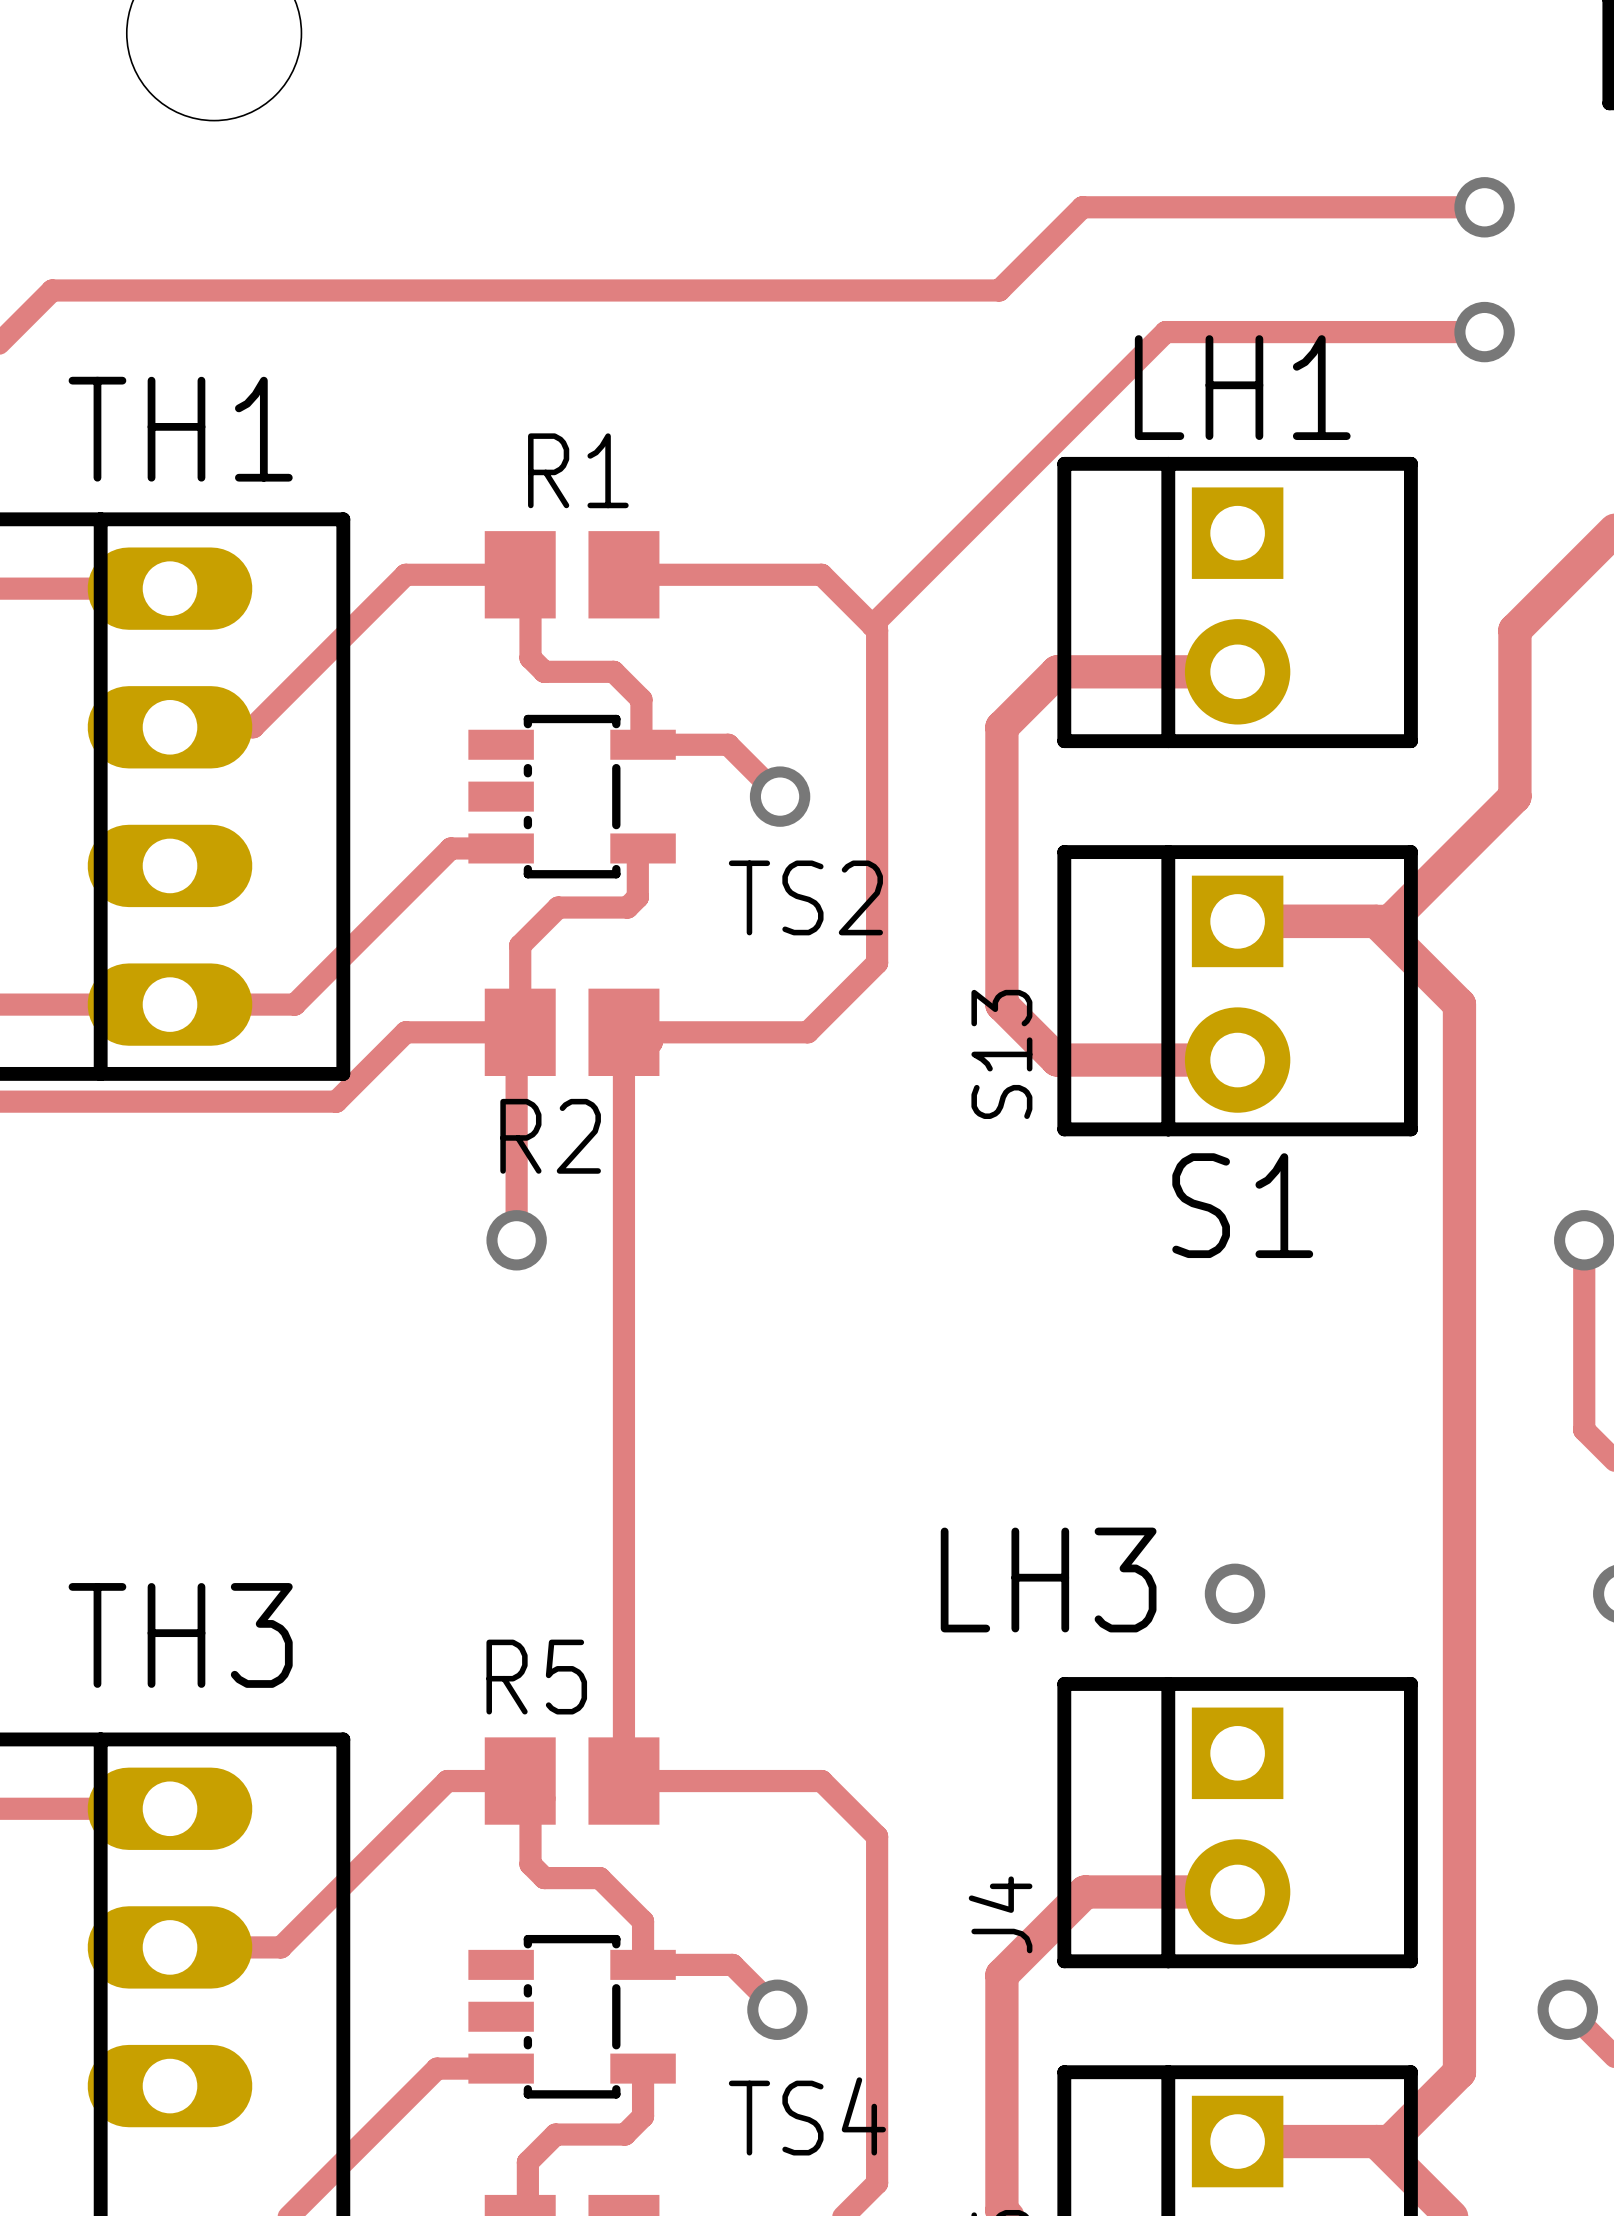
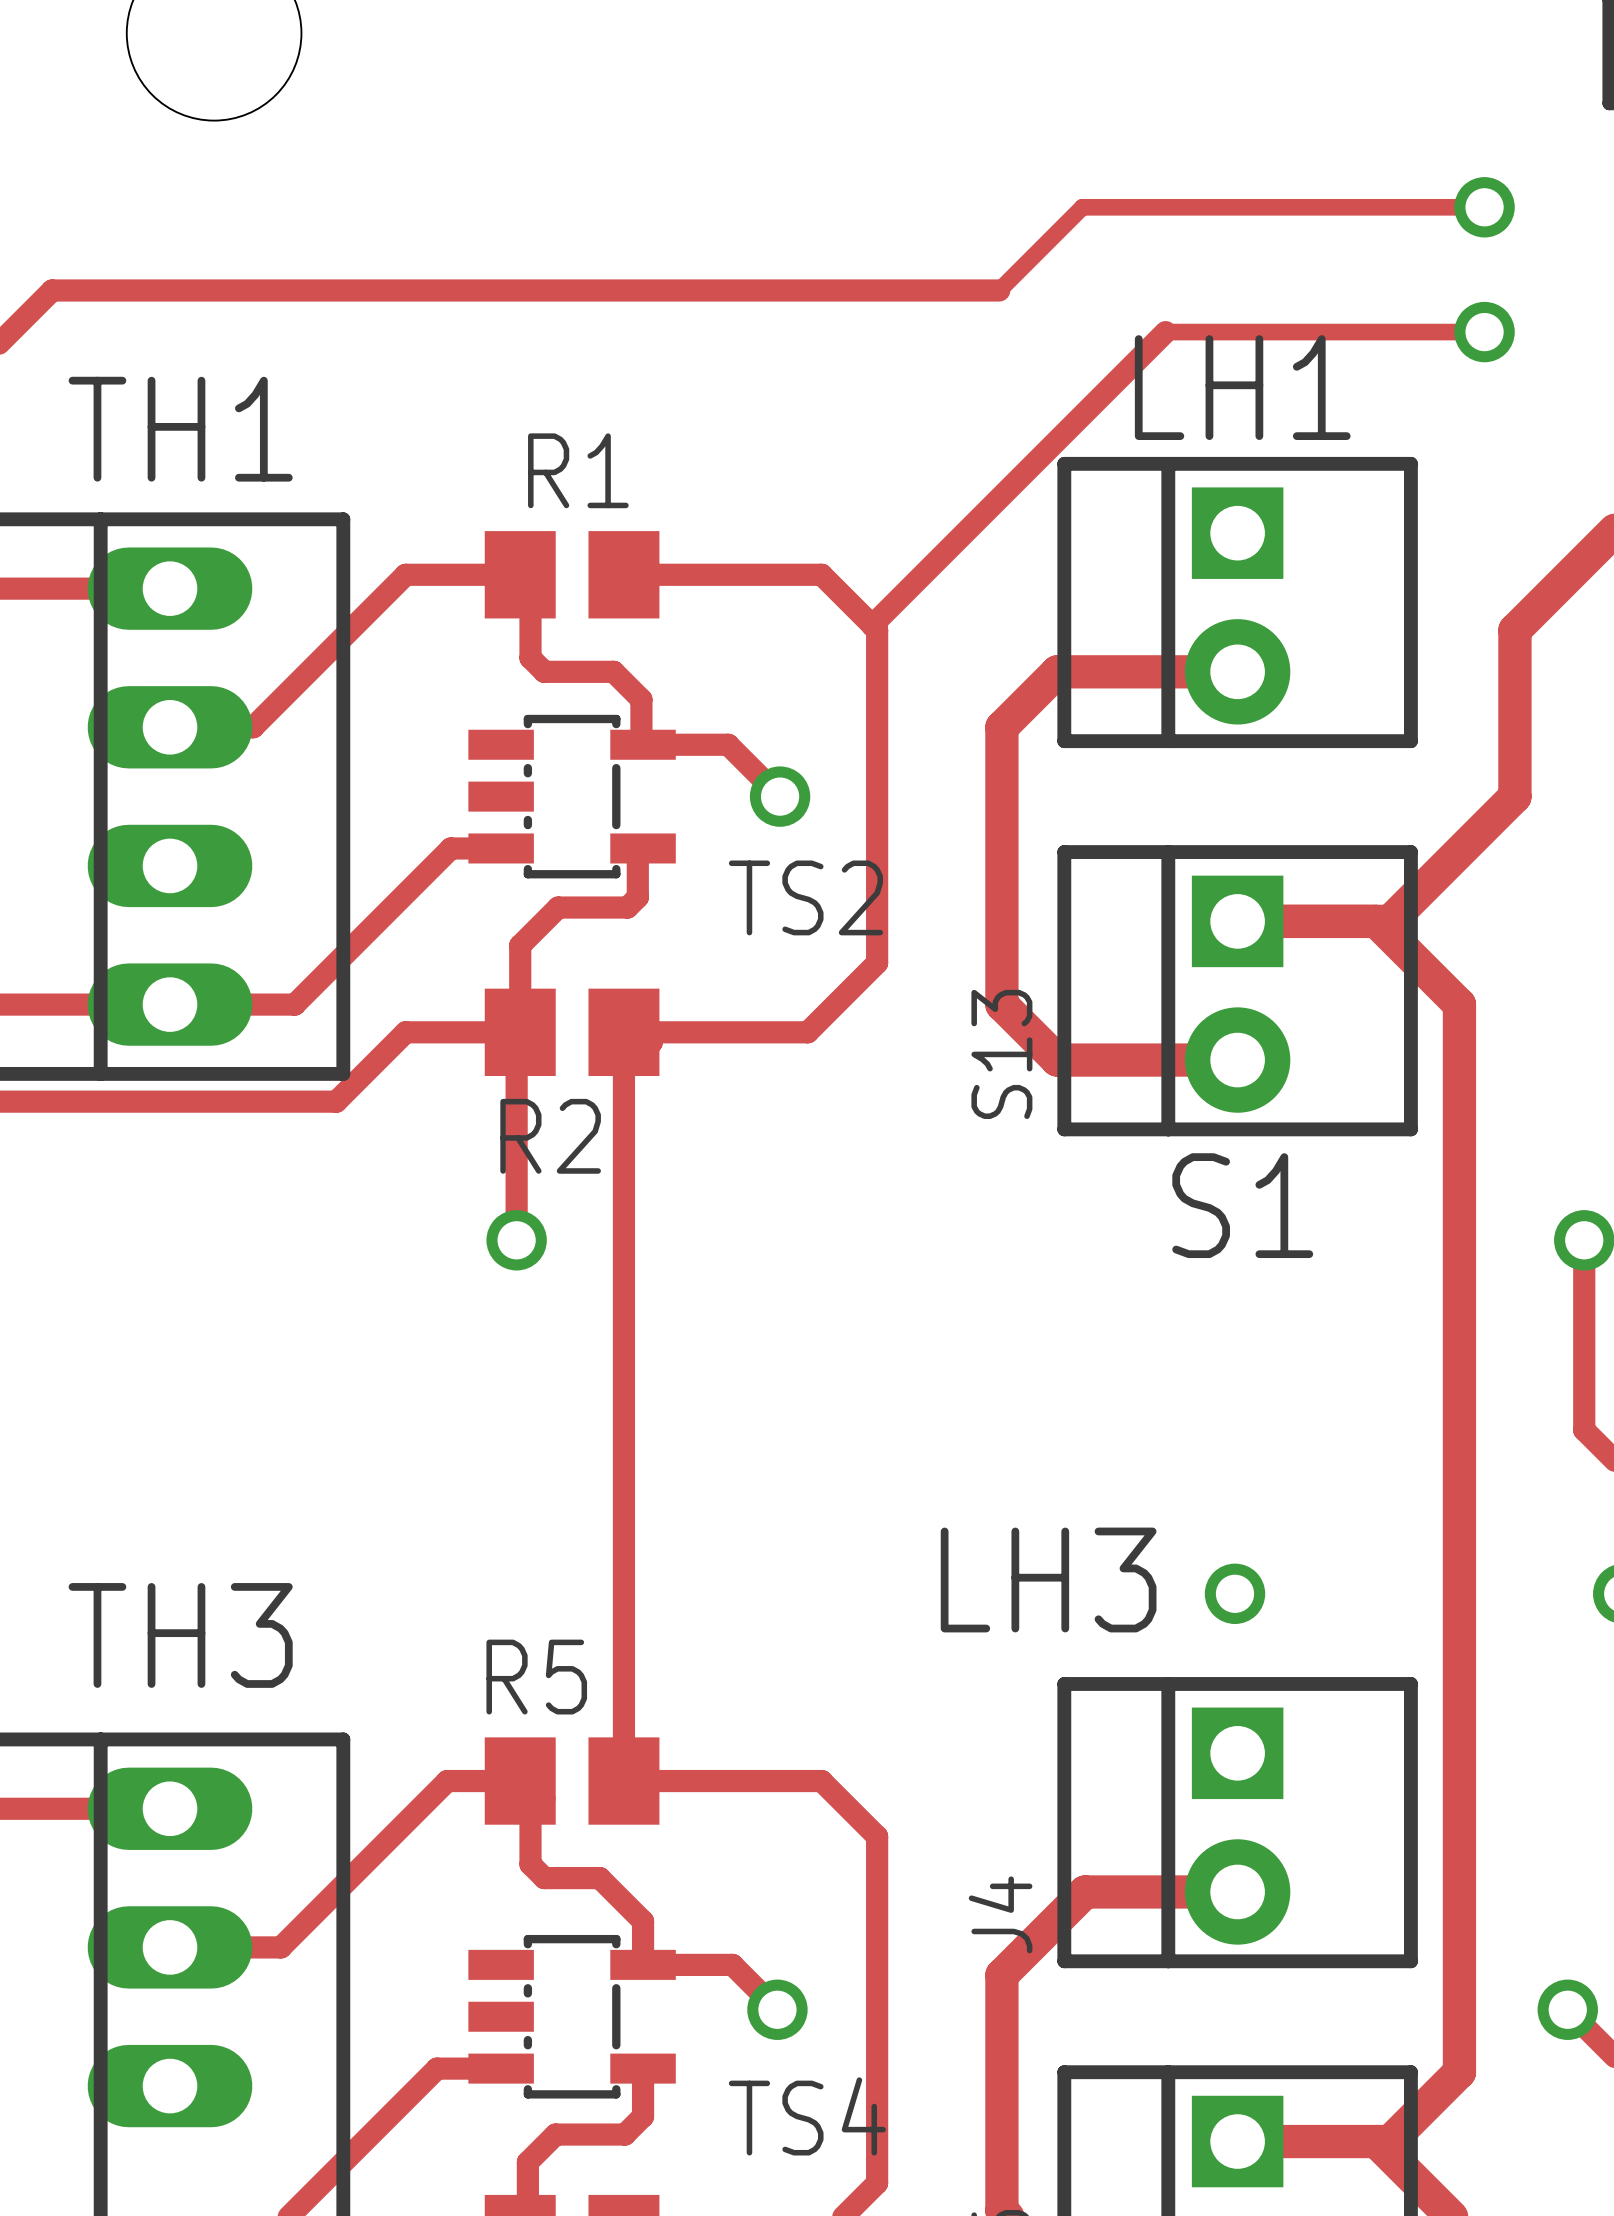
track width: thick (1484, 207) (1082, 207) (999, 290) -> thin (1484, 207) (1082, 207) (999, 290)
track width: thick (1165, 332) (1484, 332) -> thin (1165, 332) (1484, 332)

